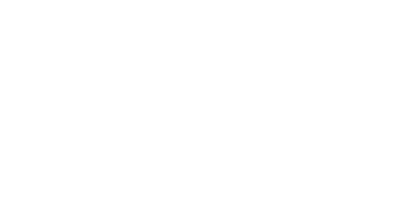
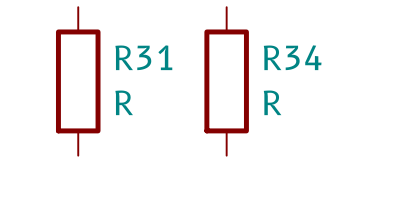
R31: none -> R (78, 81)
R34: none -> R (226, 81)

